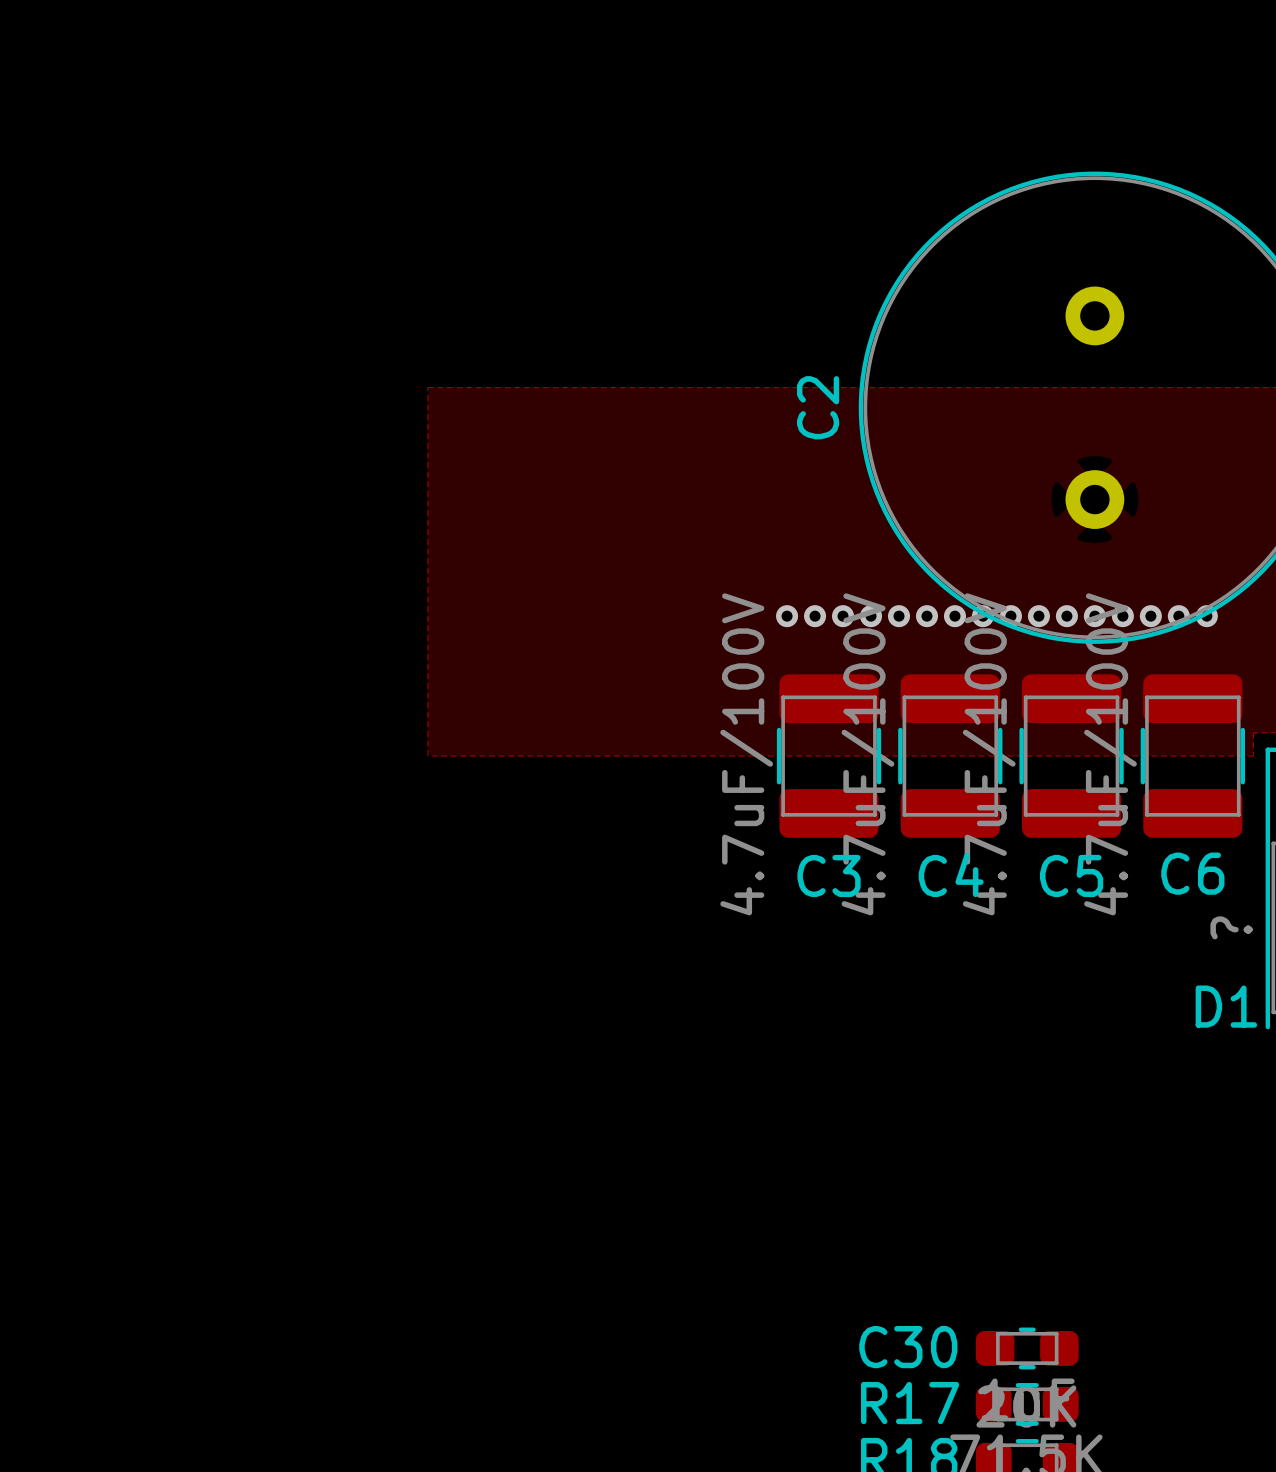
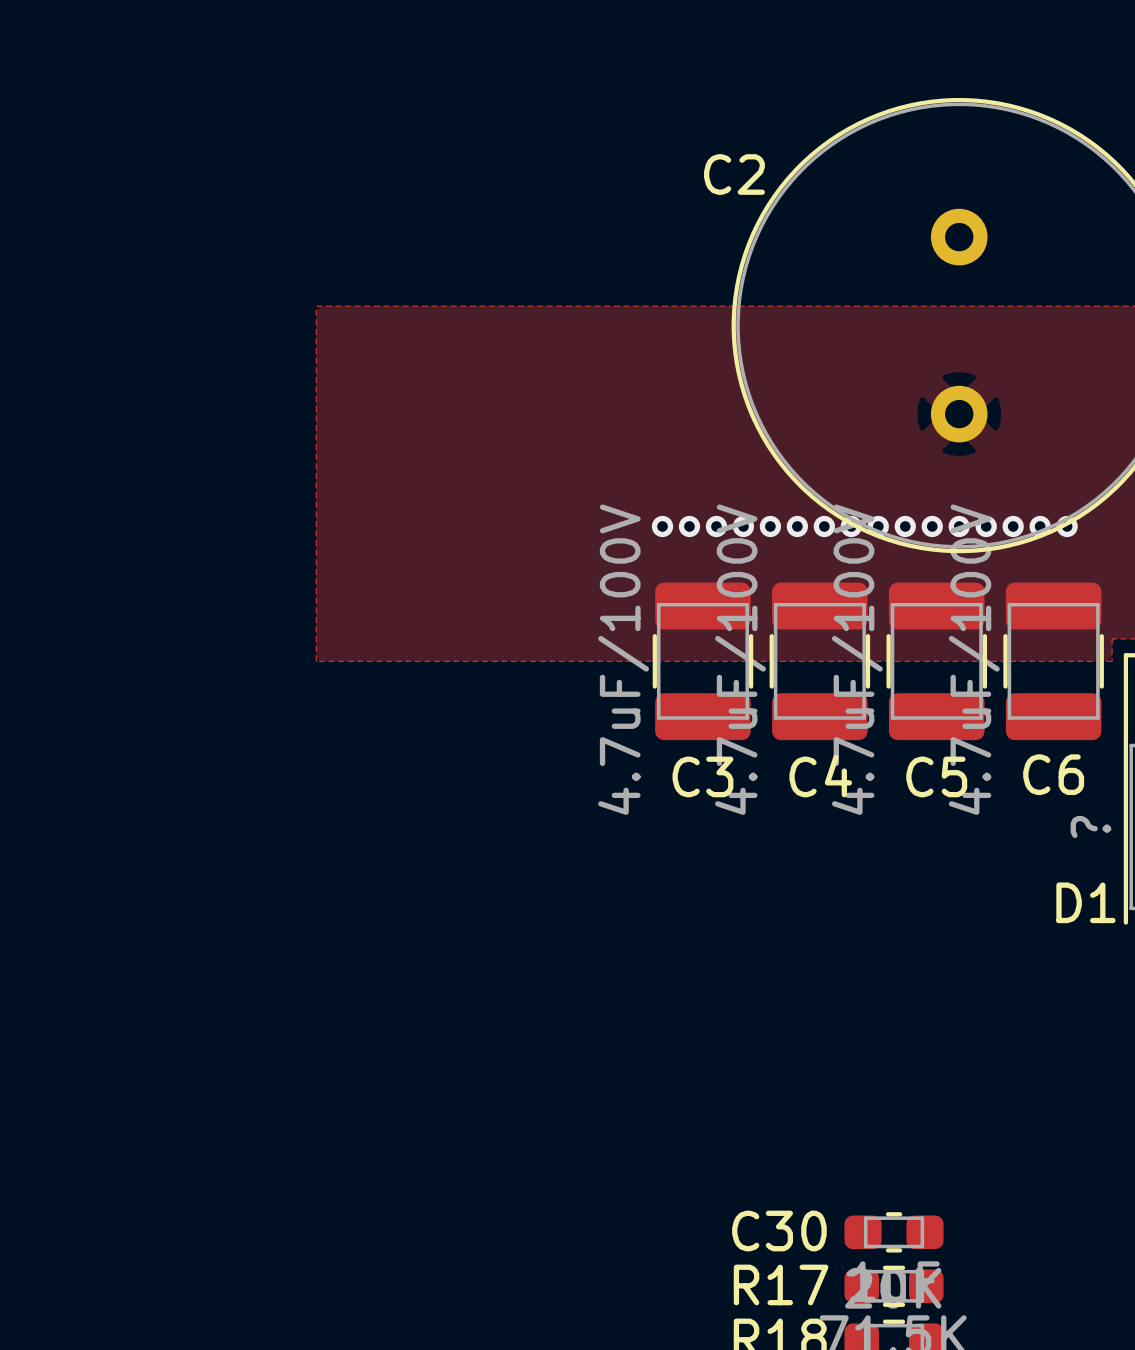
C2 name rotation: 0° (818, 407) -> 90° clockwise (734, 174)
C2 name position: C2 (818, 407) -> C2 (734, 174)

